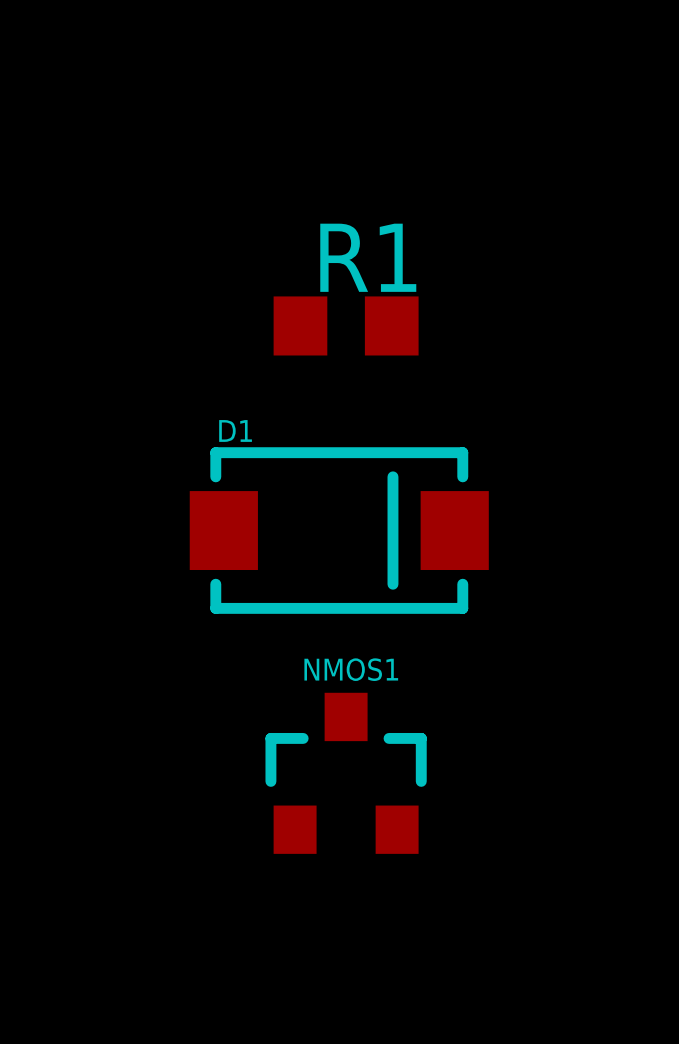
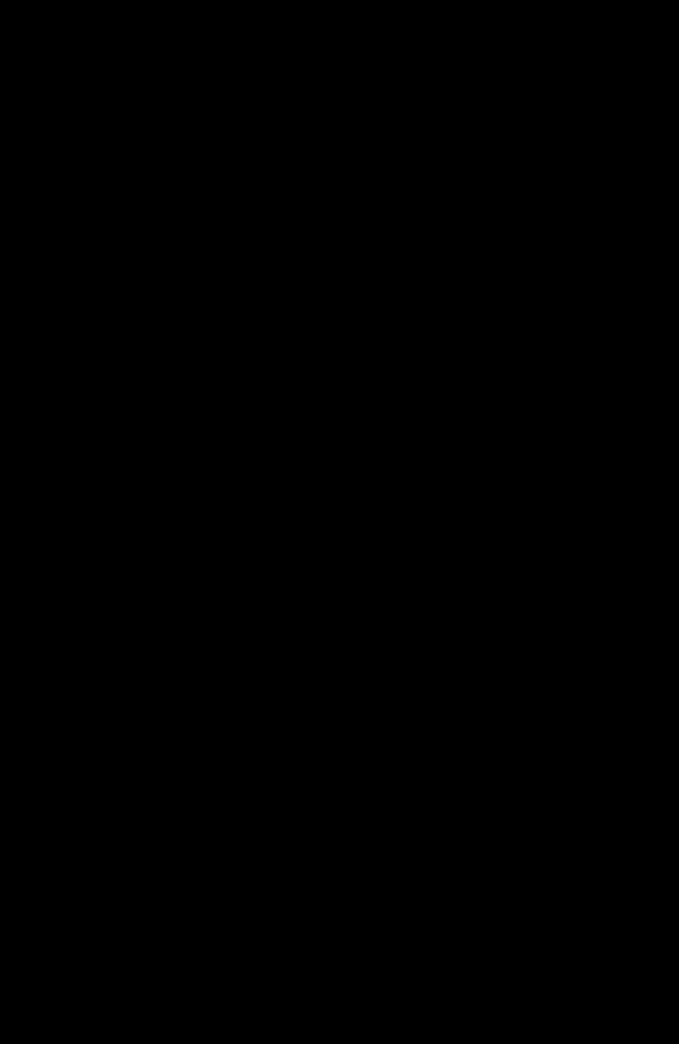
R1: (346, 325) -> none
D1: (339, 530) -> none
NMOS1: (346, 773) -> none

